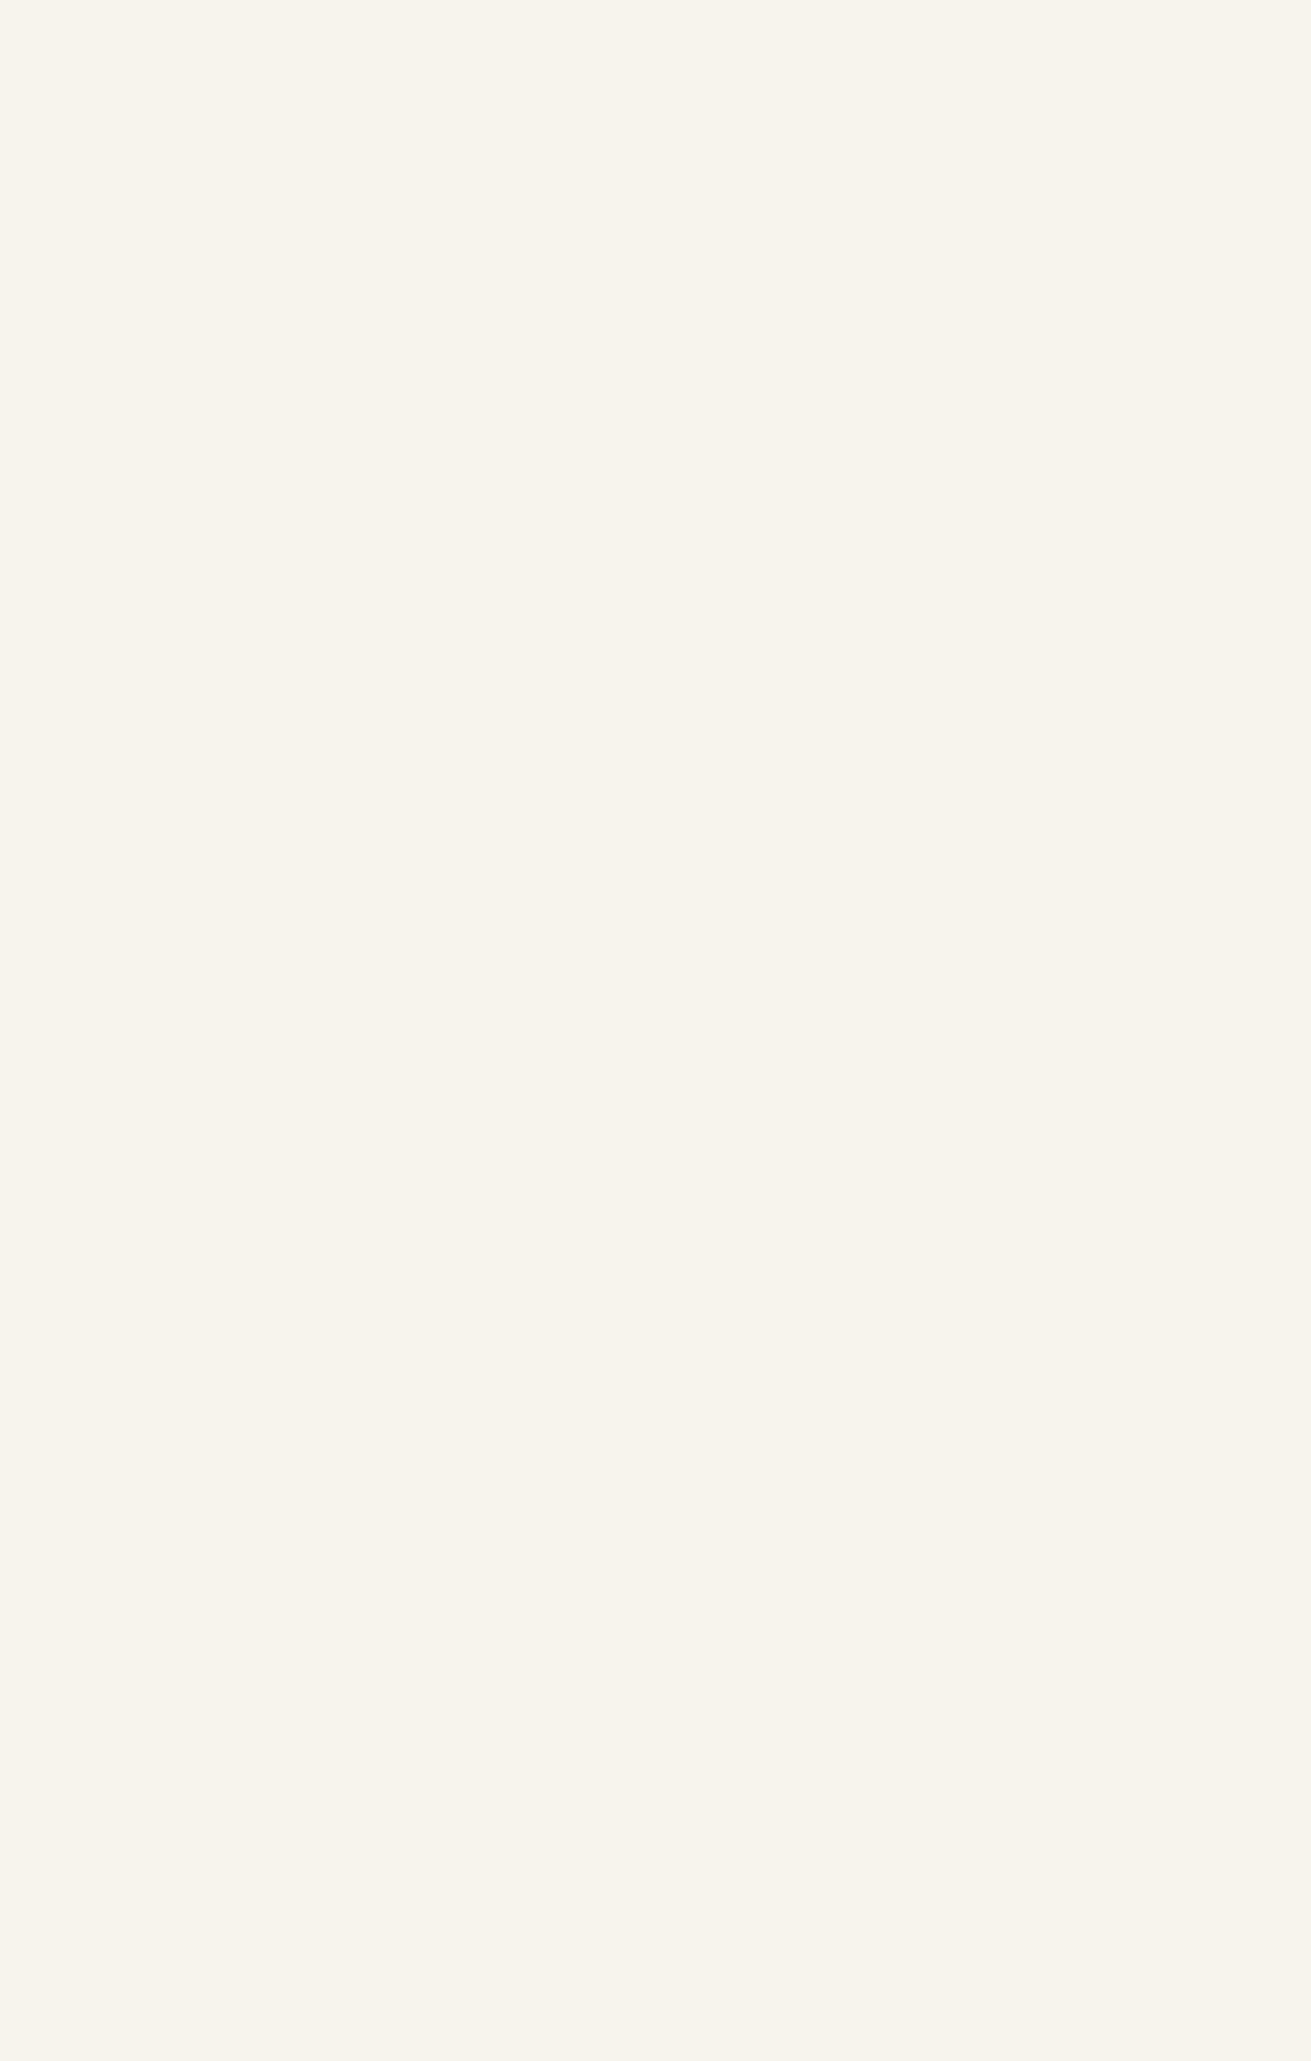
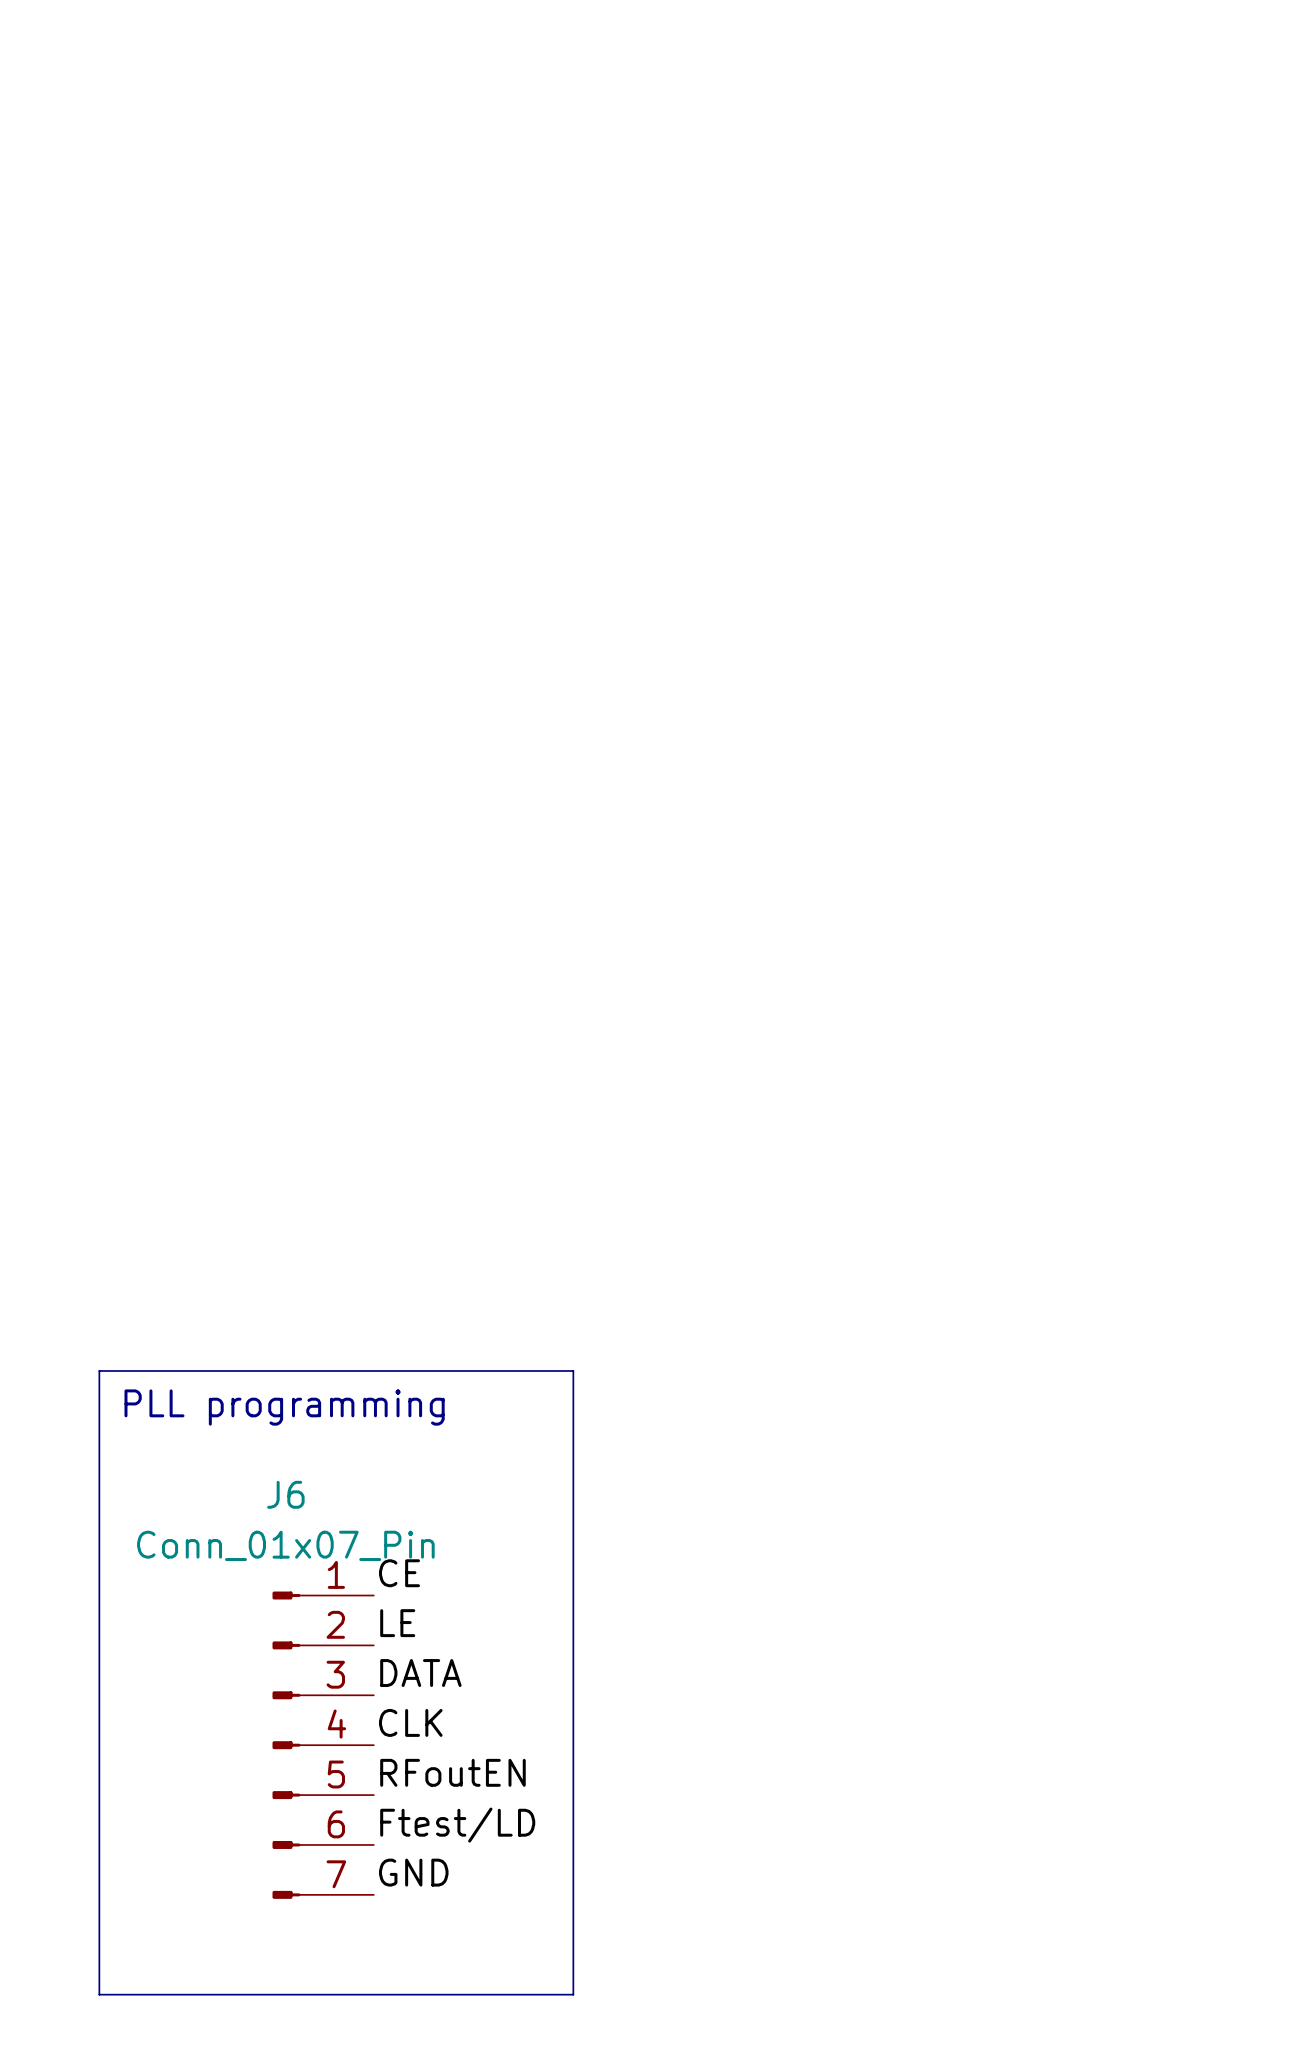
line: none -> (99, 1370) (573, 1370) (573, 1994) (99, 1994) (99, 1370)
text: none -> PLL programming (284, 1407)
label: none -> CE (399, 1573)
label: none -> LE (397, 1623)
label: none -> DATA (420, 1673)
label: none -> CLK (410, 1722)
J6: none -> Conn_01x07_Pin (323, 1745)
label: none -> RFoutEN (452, 1772)
label: none -> Ftest/LD (457, 1825)
label: none -> GND (413, 1872)

